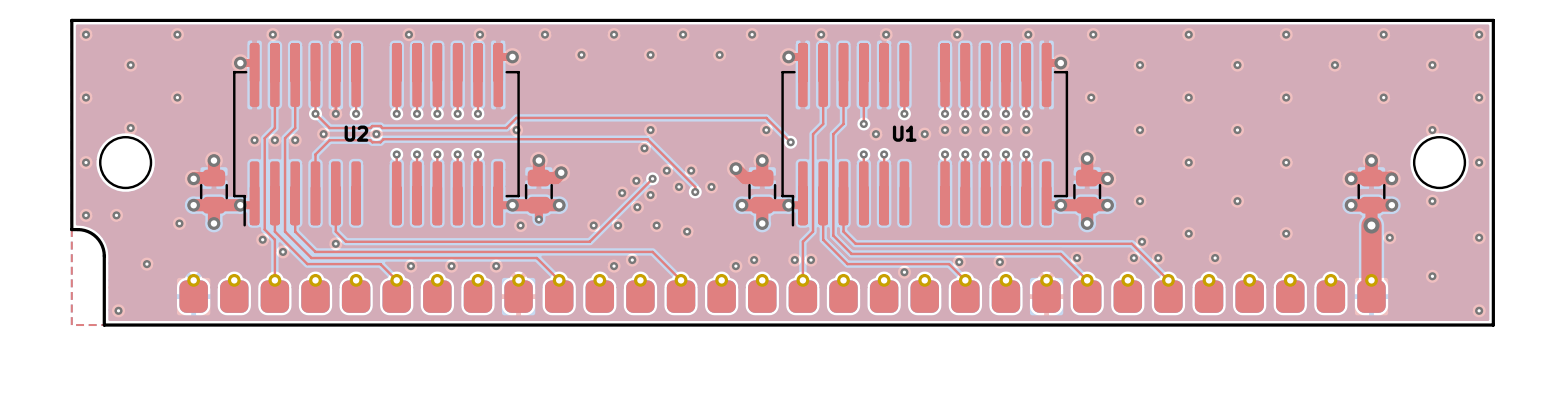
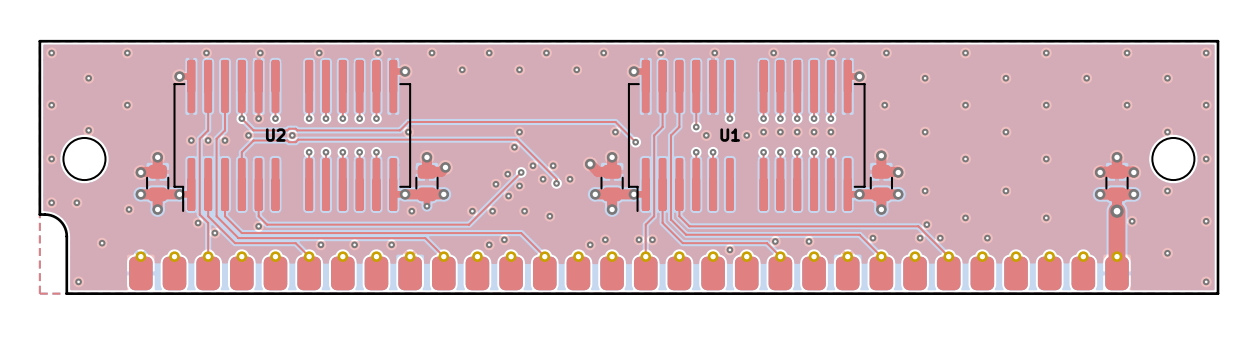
part footprint: [179, 273, 1386, 313] -> [129, 251, 1129, 291]

